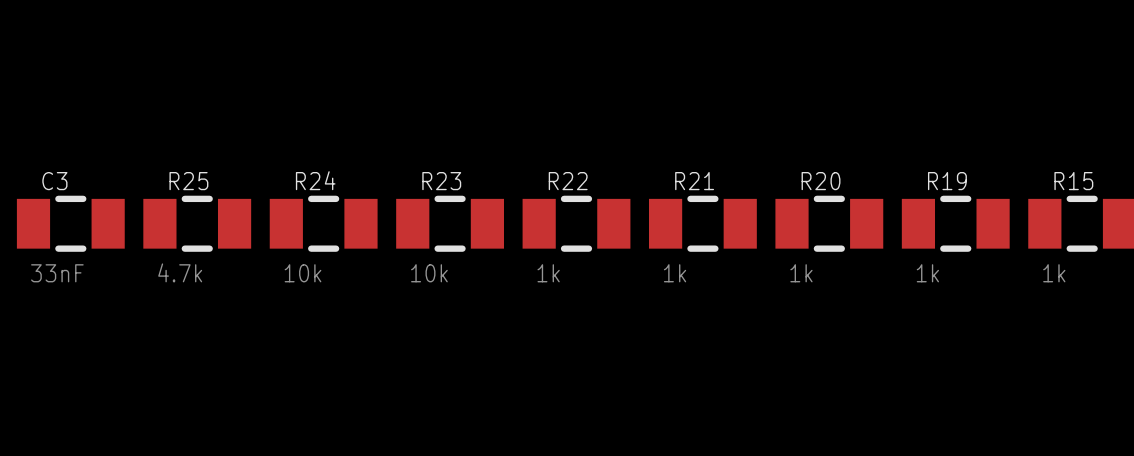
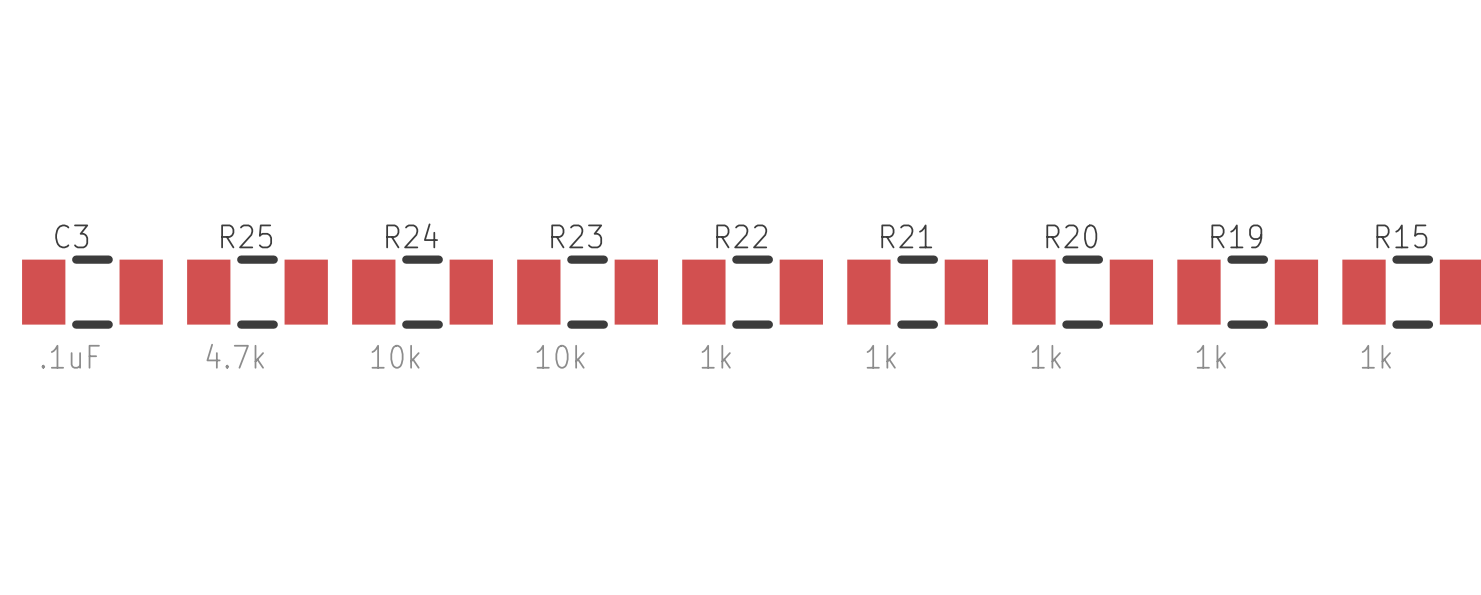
C3 value: 33nF (57, 273) -> .1uF (70, 356)

